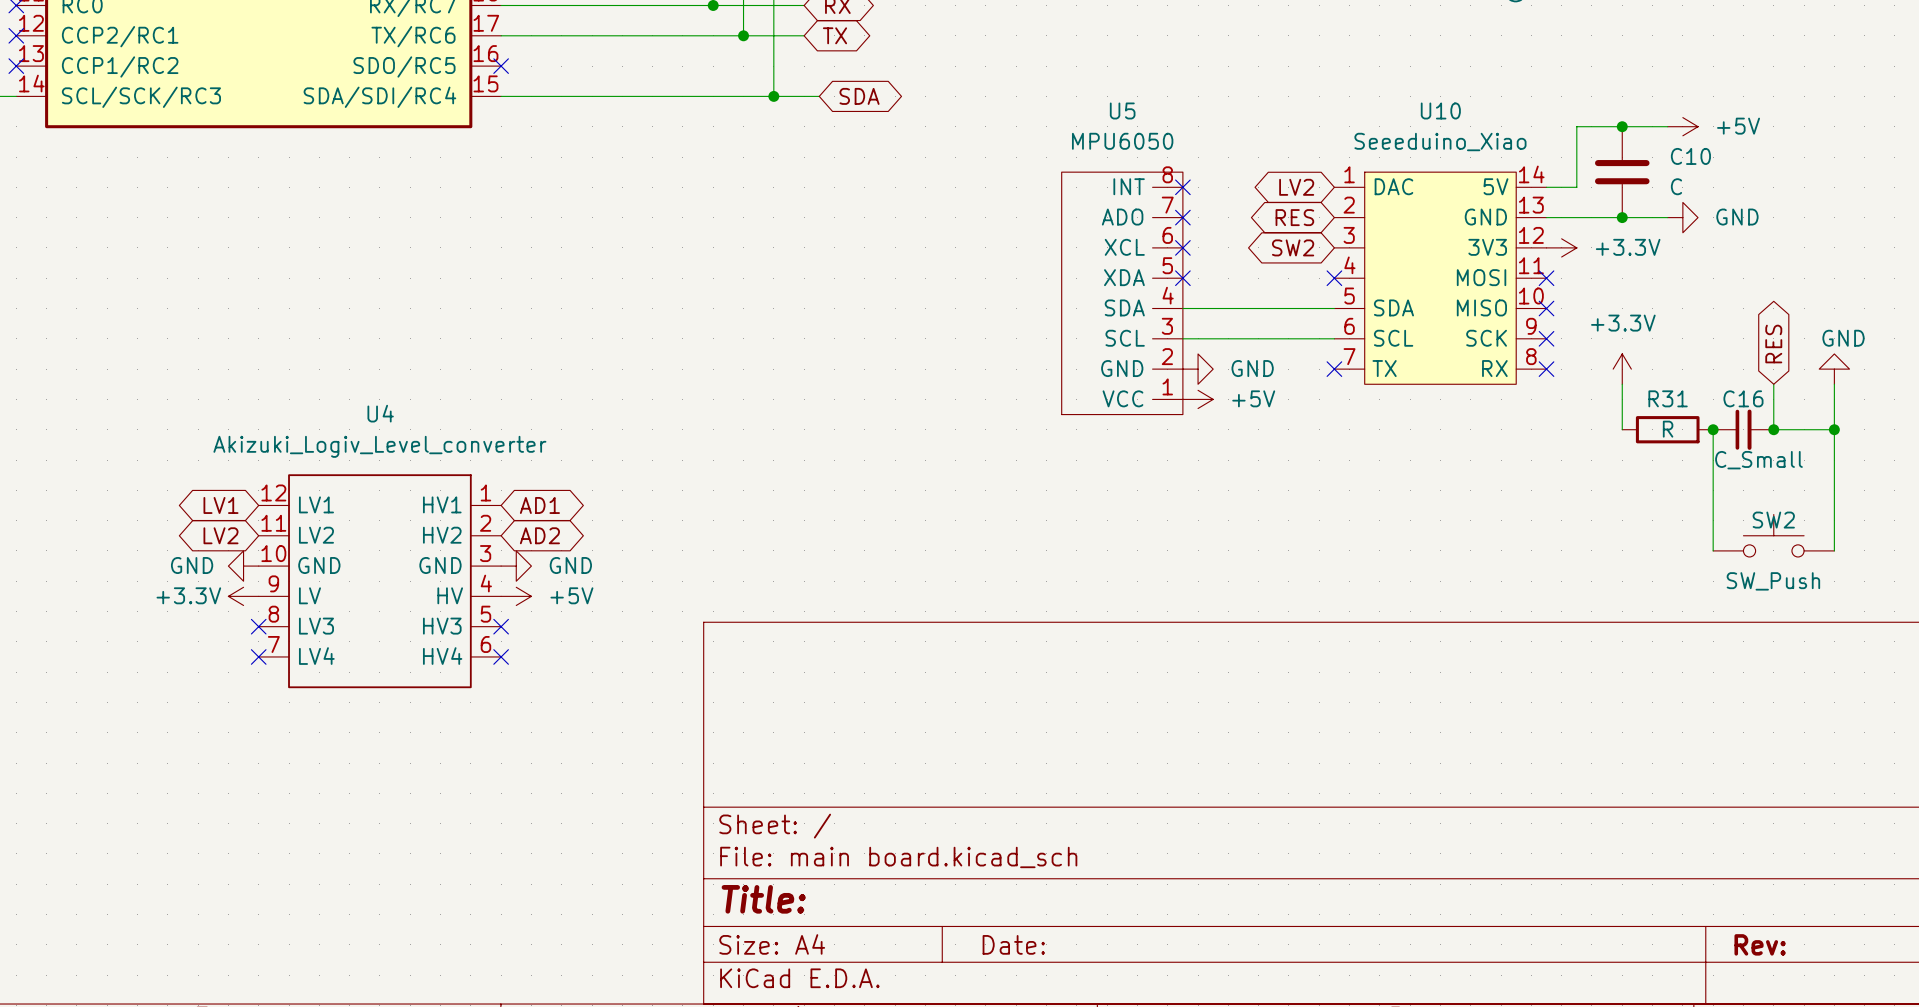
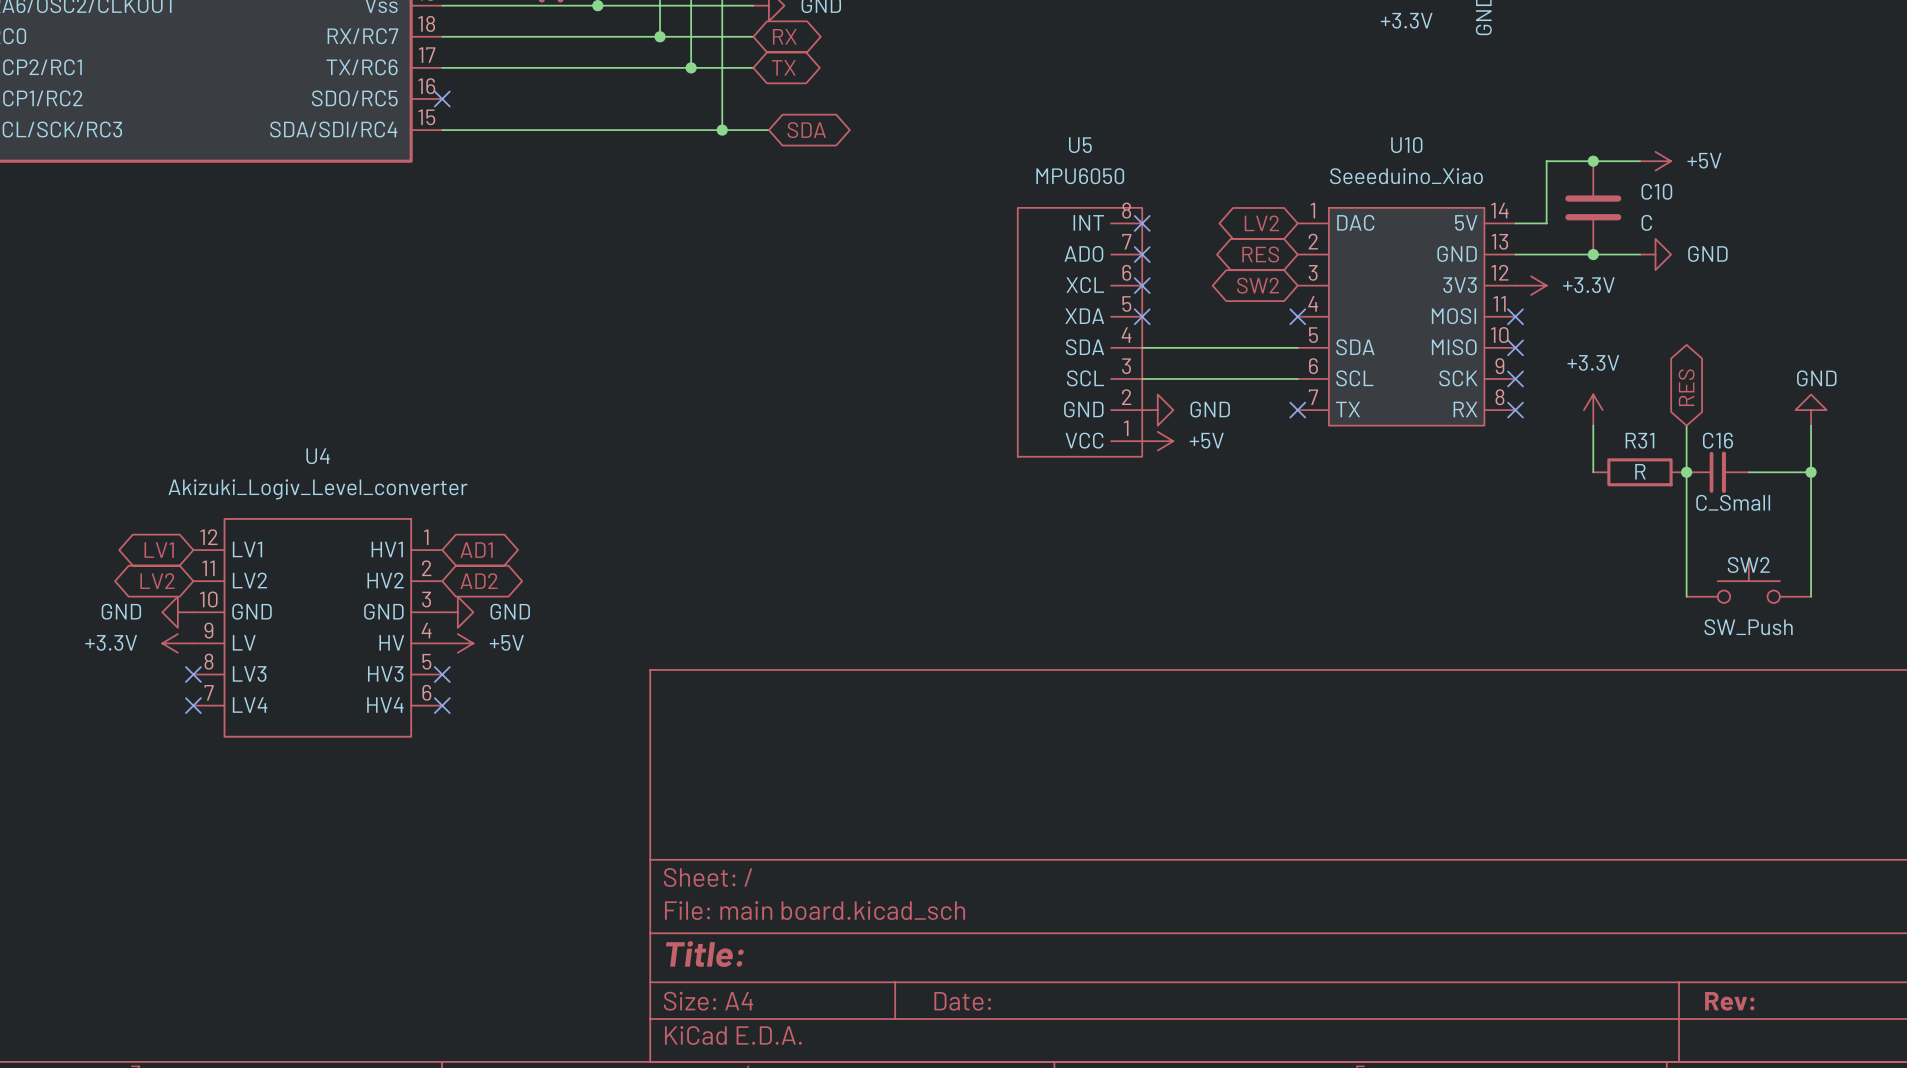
global label position: RES (1773, 344) -> RES (1686, 387)
wire: (1773, 384) (1773, 429) -> (1686, 425) (1686, 472)
junction: (1773, 429) -> none

